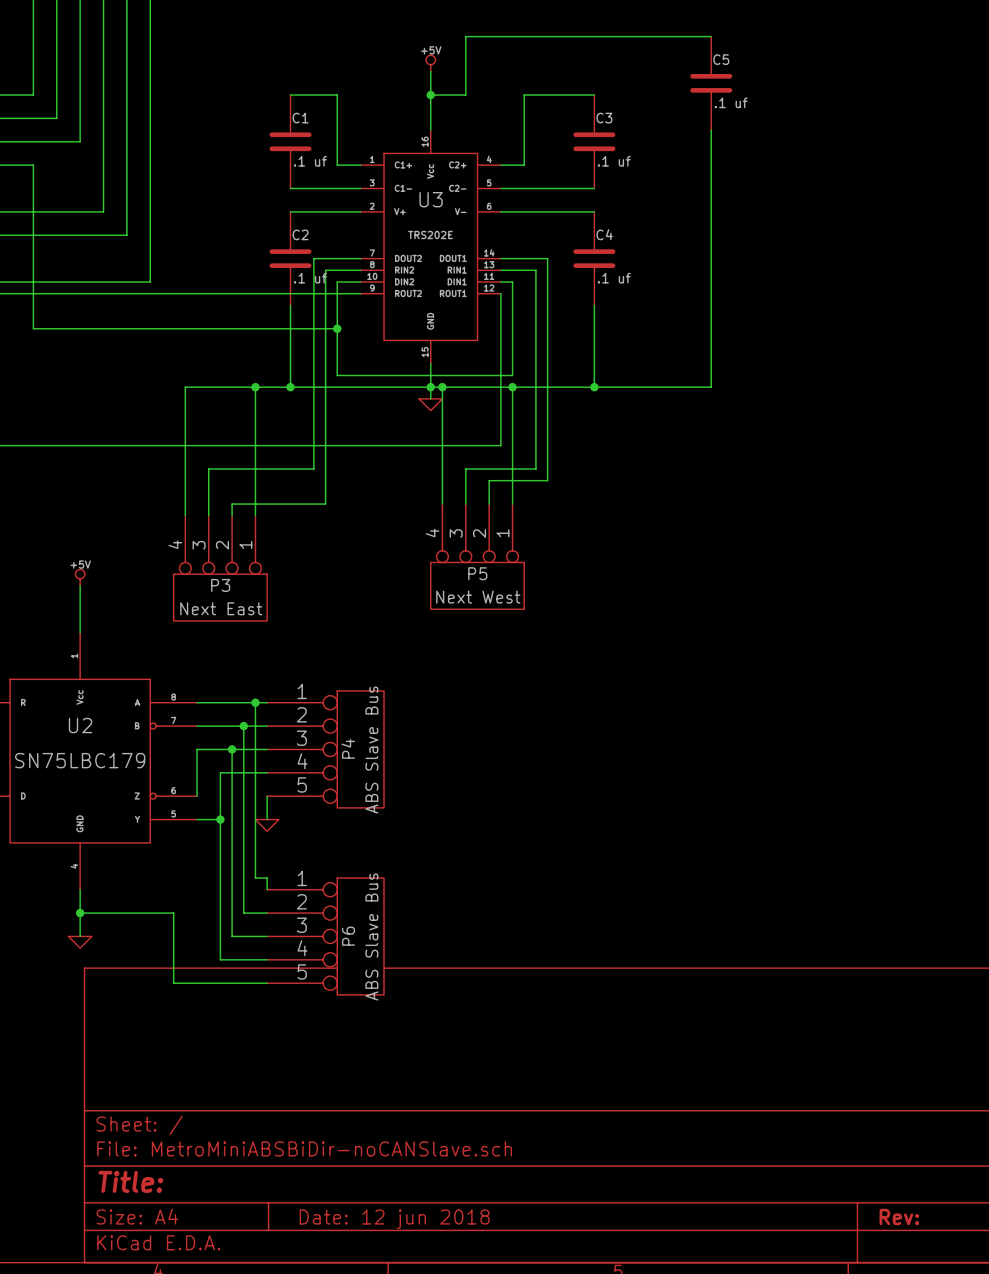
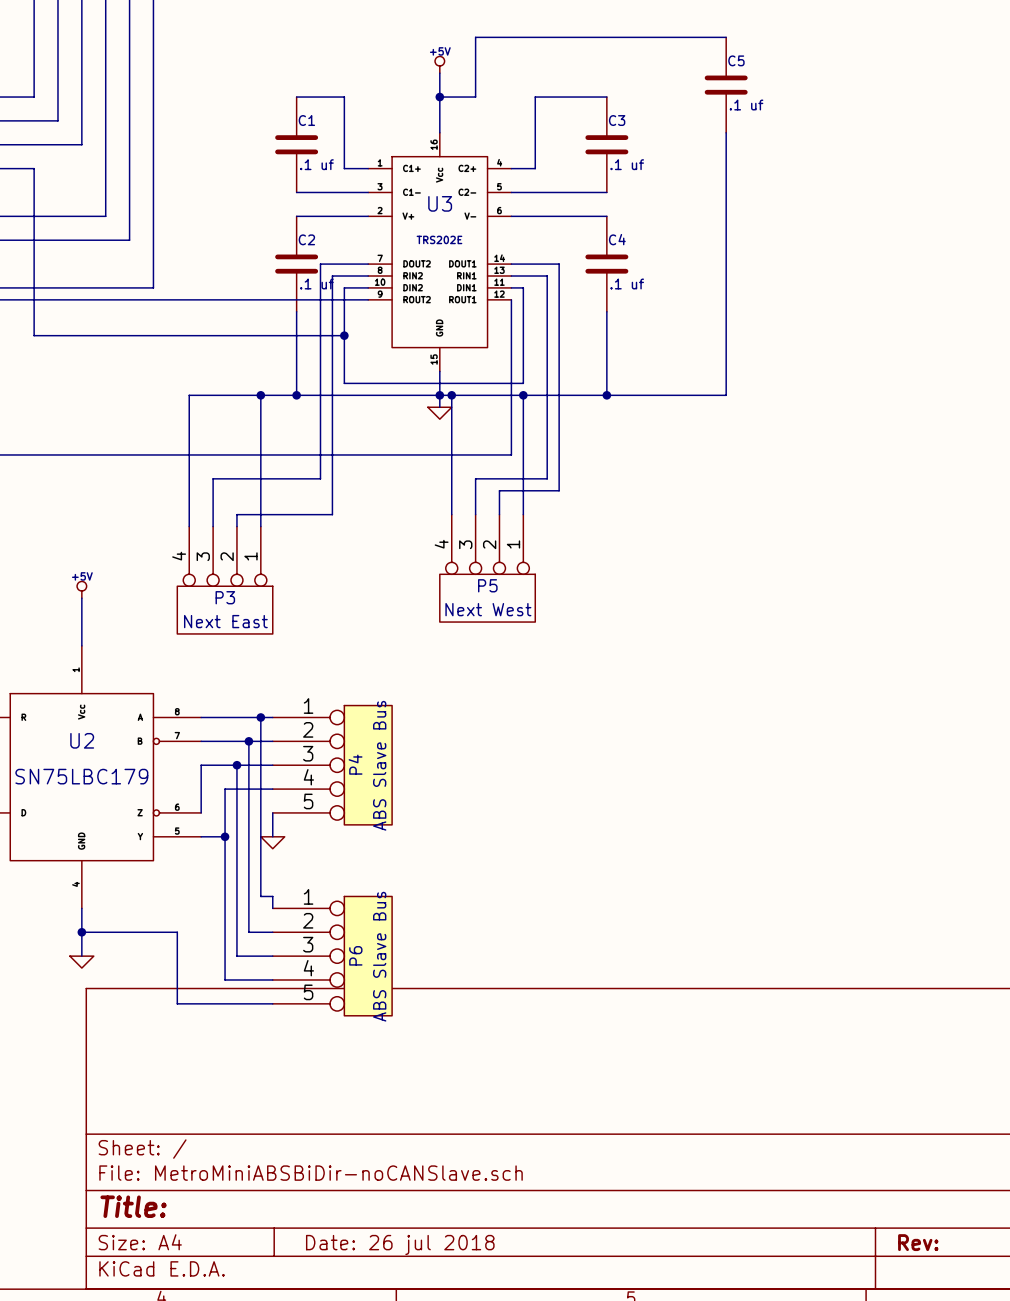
title block: Date: 12 jun 2018 (394, 1219) -> Date: 26 jul 2018 (400, 1244)

